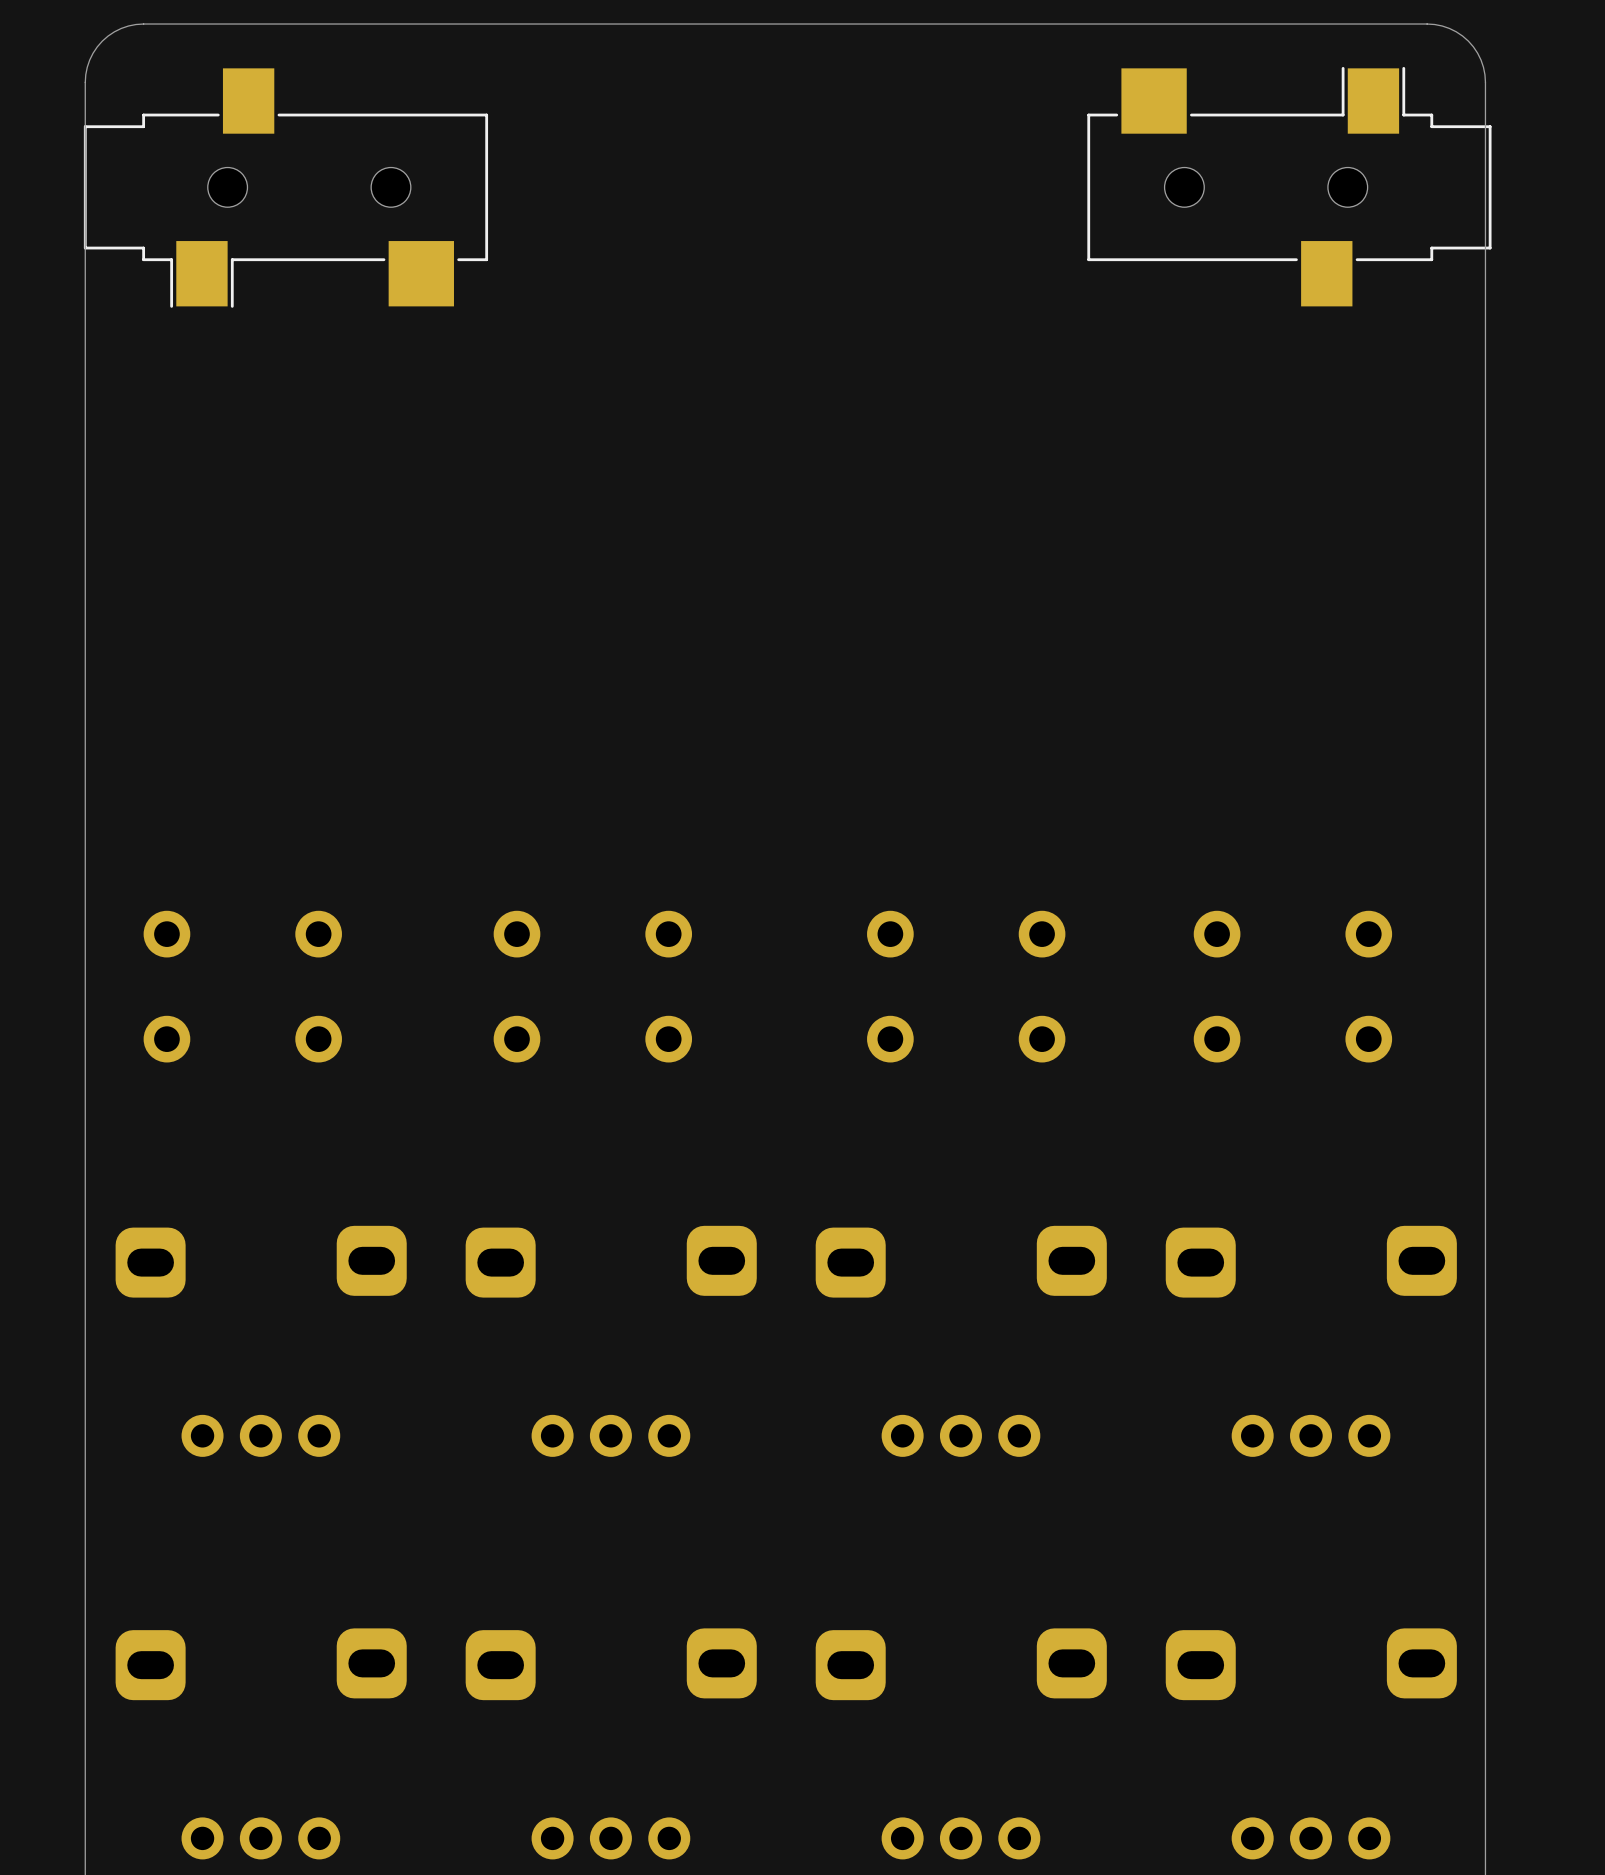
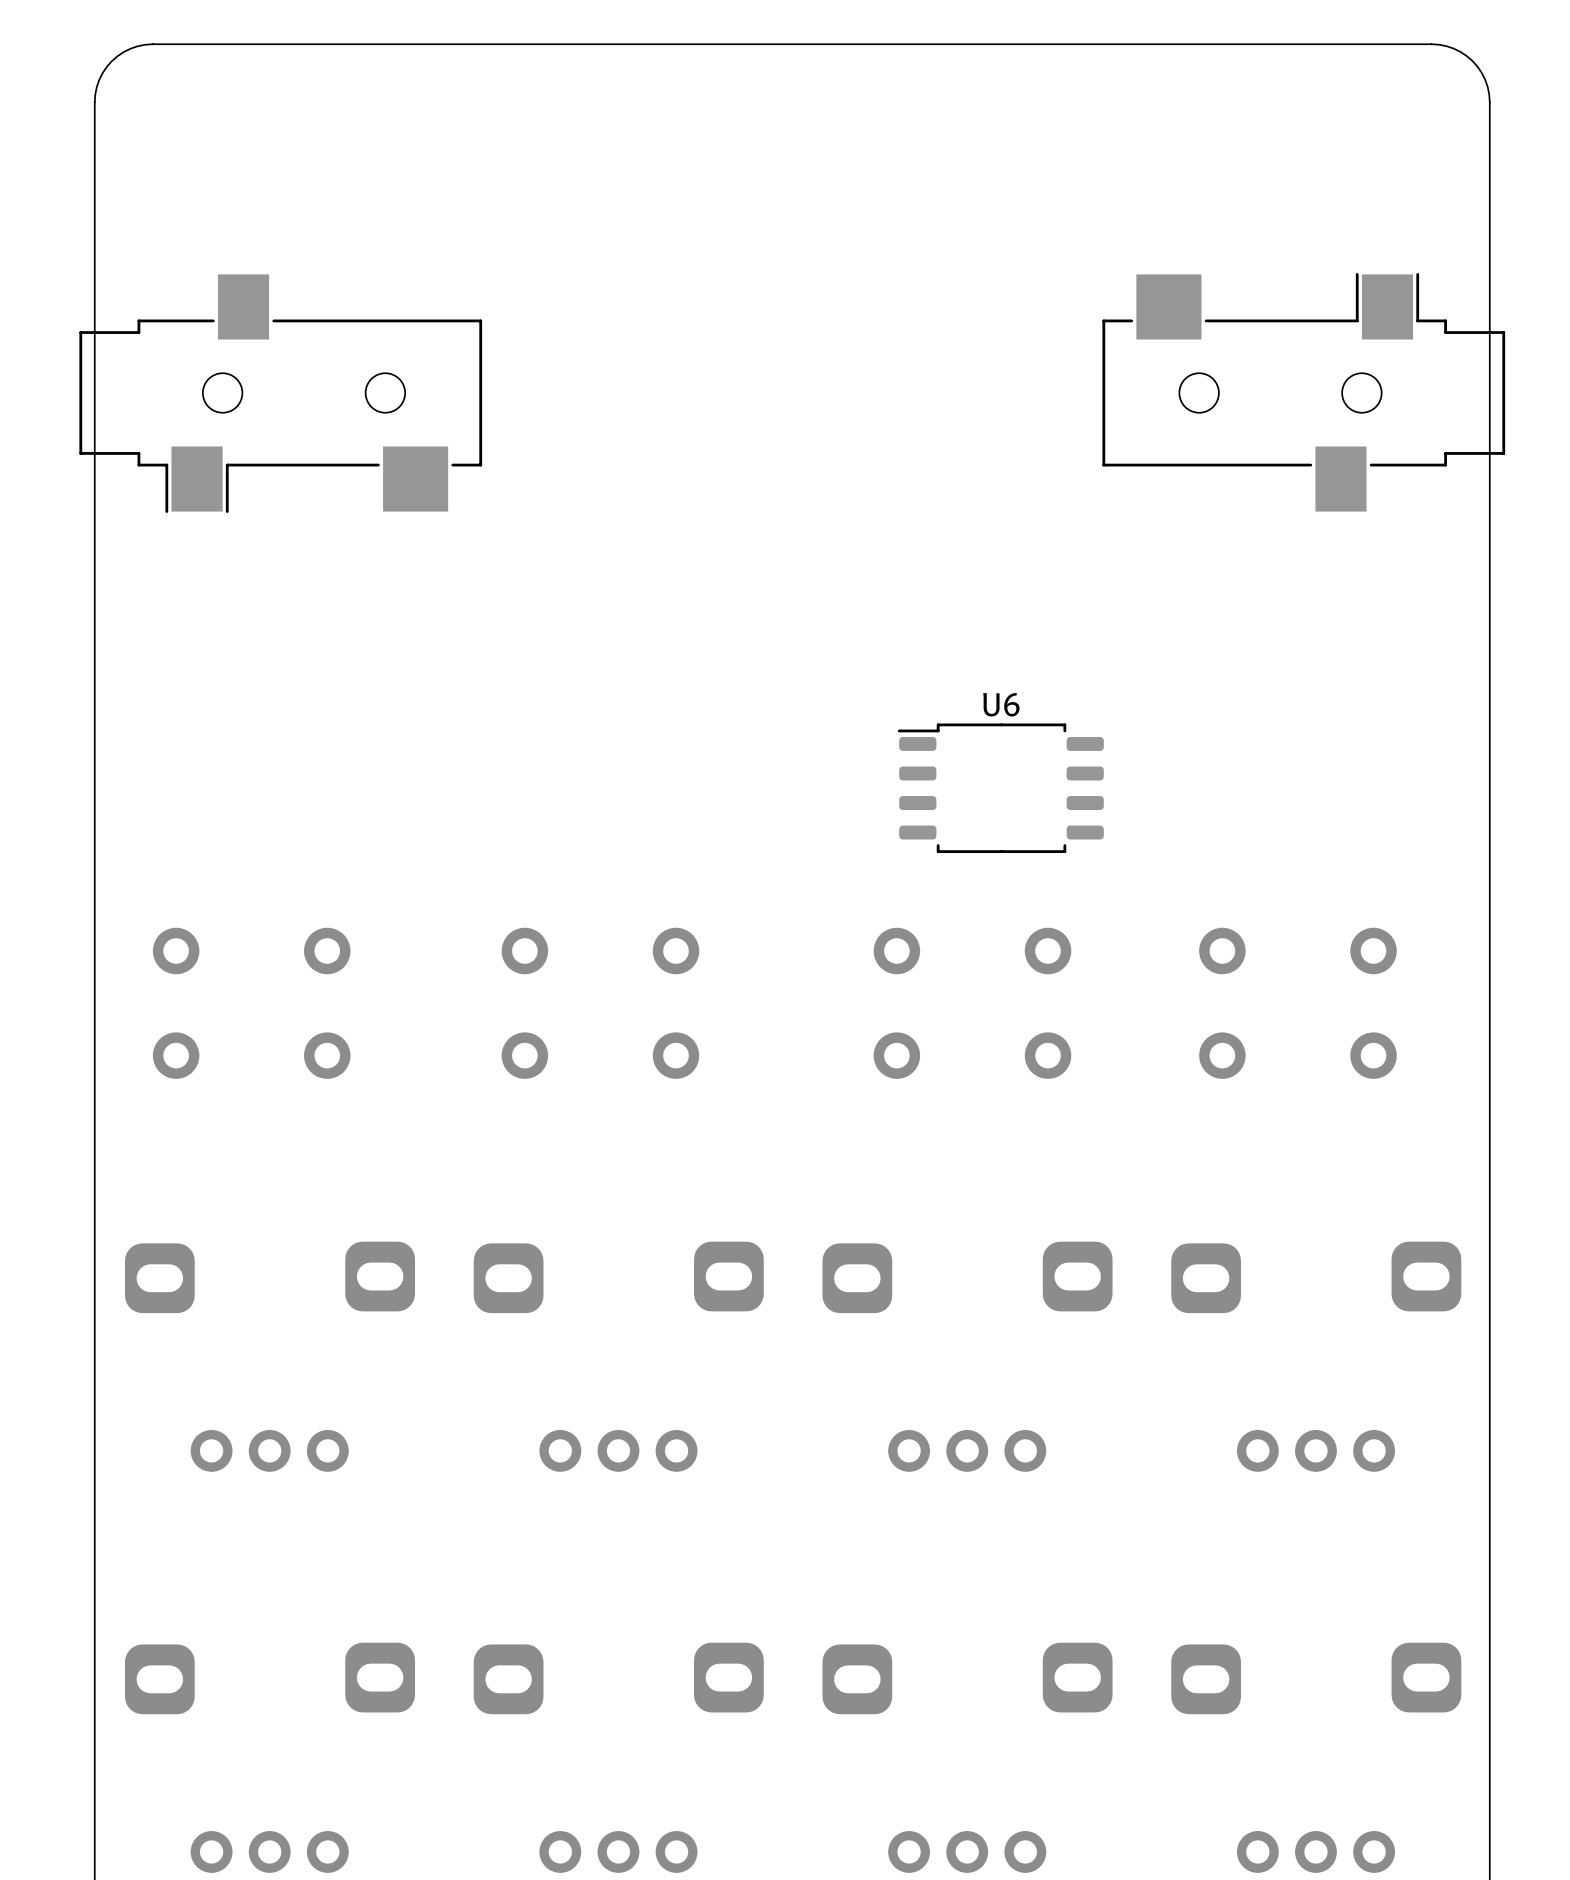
part position: (1289, 186) -> (1303, 392)
part position: (285, 188) -> (280, 393)
U6: none -> (1000, 788)

